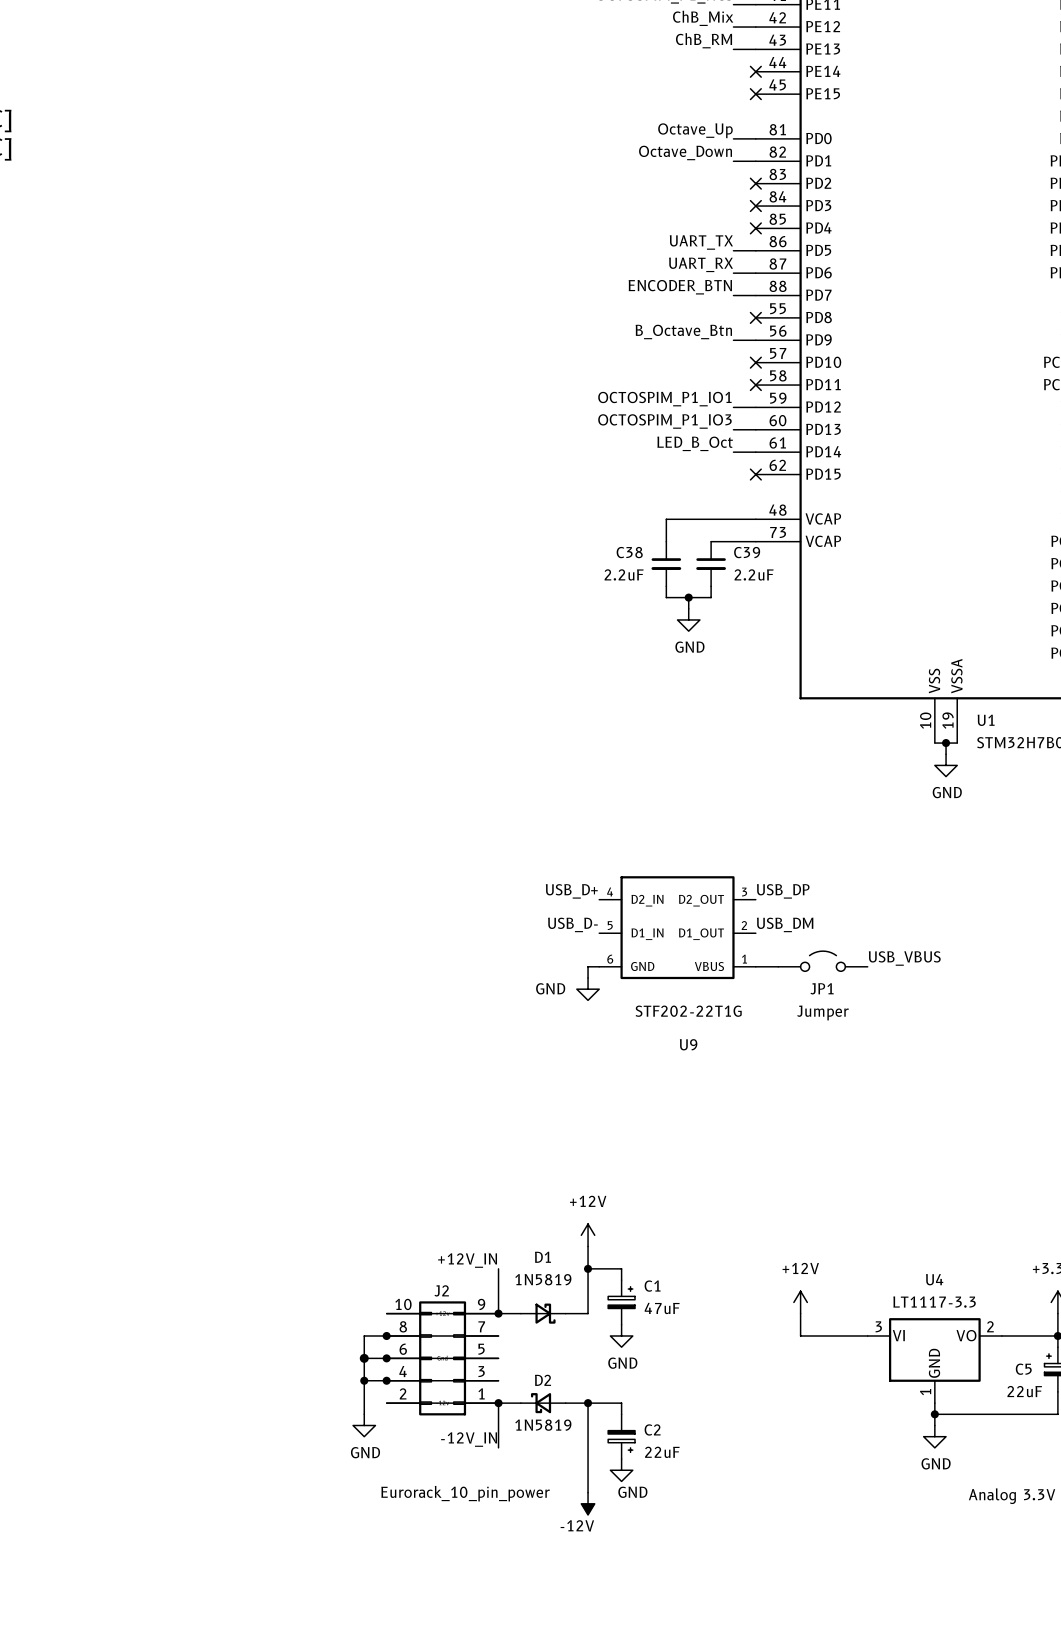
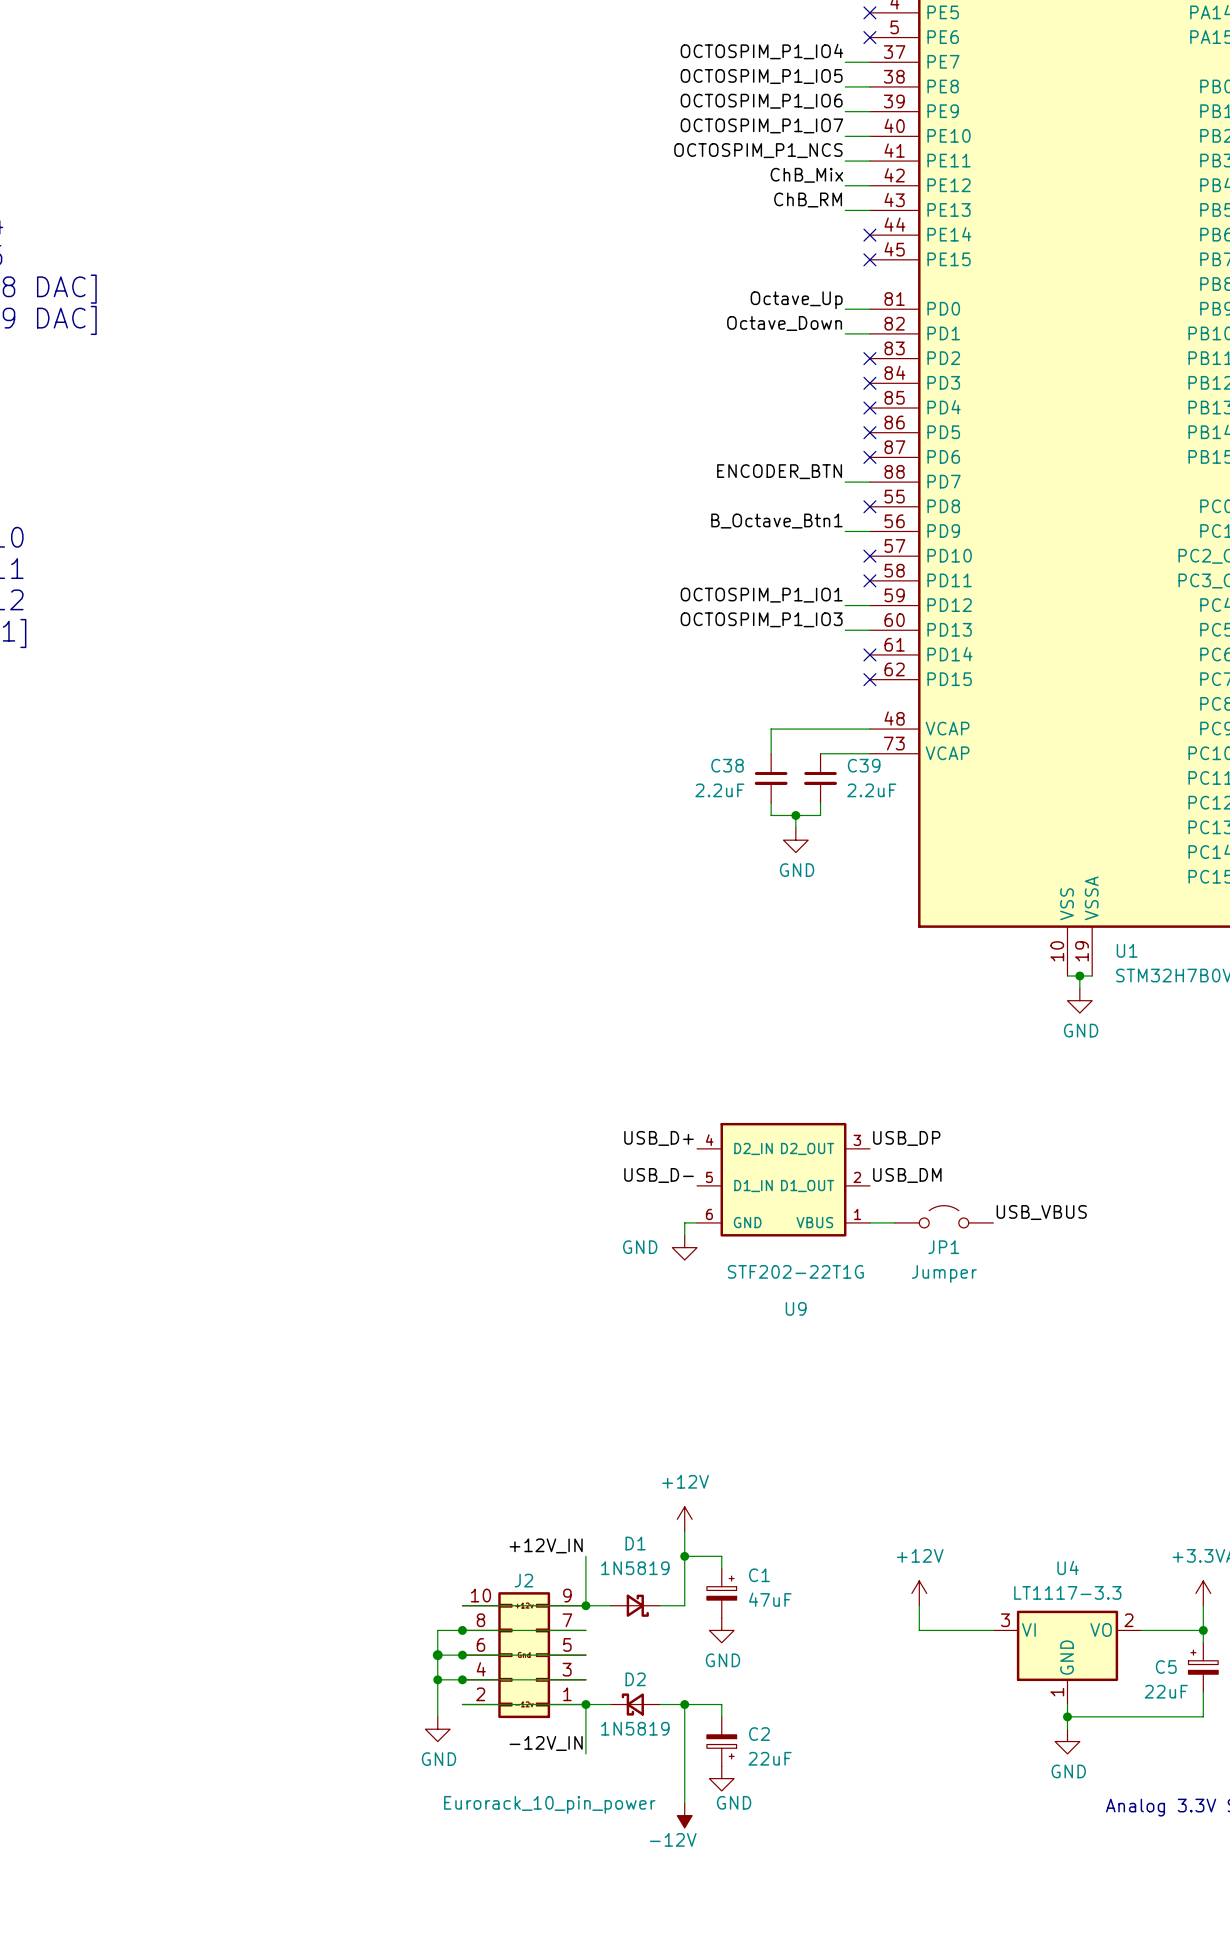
label: UART_TX (701, 242) -> none
wire: (733, 250) (755, 250) -> none
no-connect mark: none -> (869, 432)
label: UART_RX (701, 264) -> none
wire: (733, 273) (755, 273) -> none
no-connect mark: none -> (869, 457)
label: B_Octave_Btn (683, 331) -> B_Octave_Btn1 (776, 521)
label: LED_B_Oct (695, 443) -> none
wire: (733, 452) (755, 452) -> none
no-connect mark: none -> (869, 654)

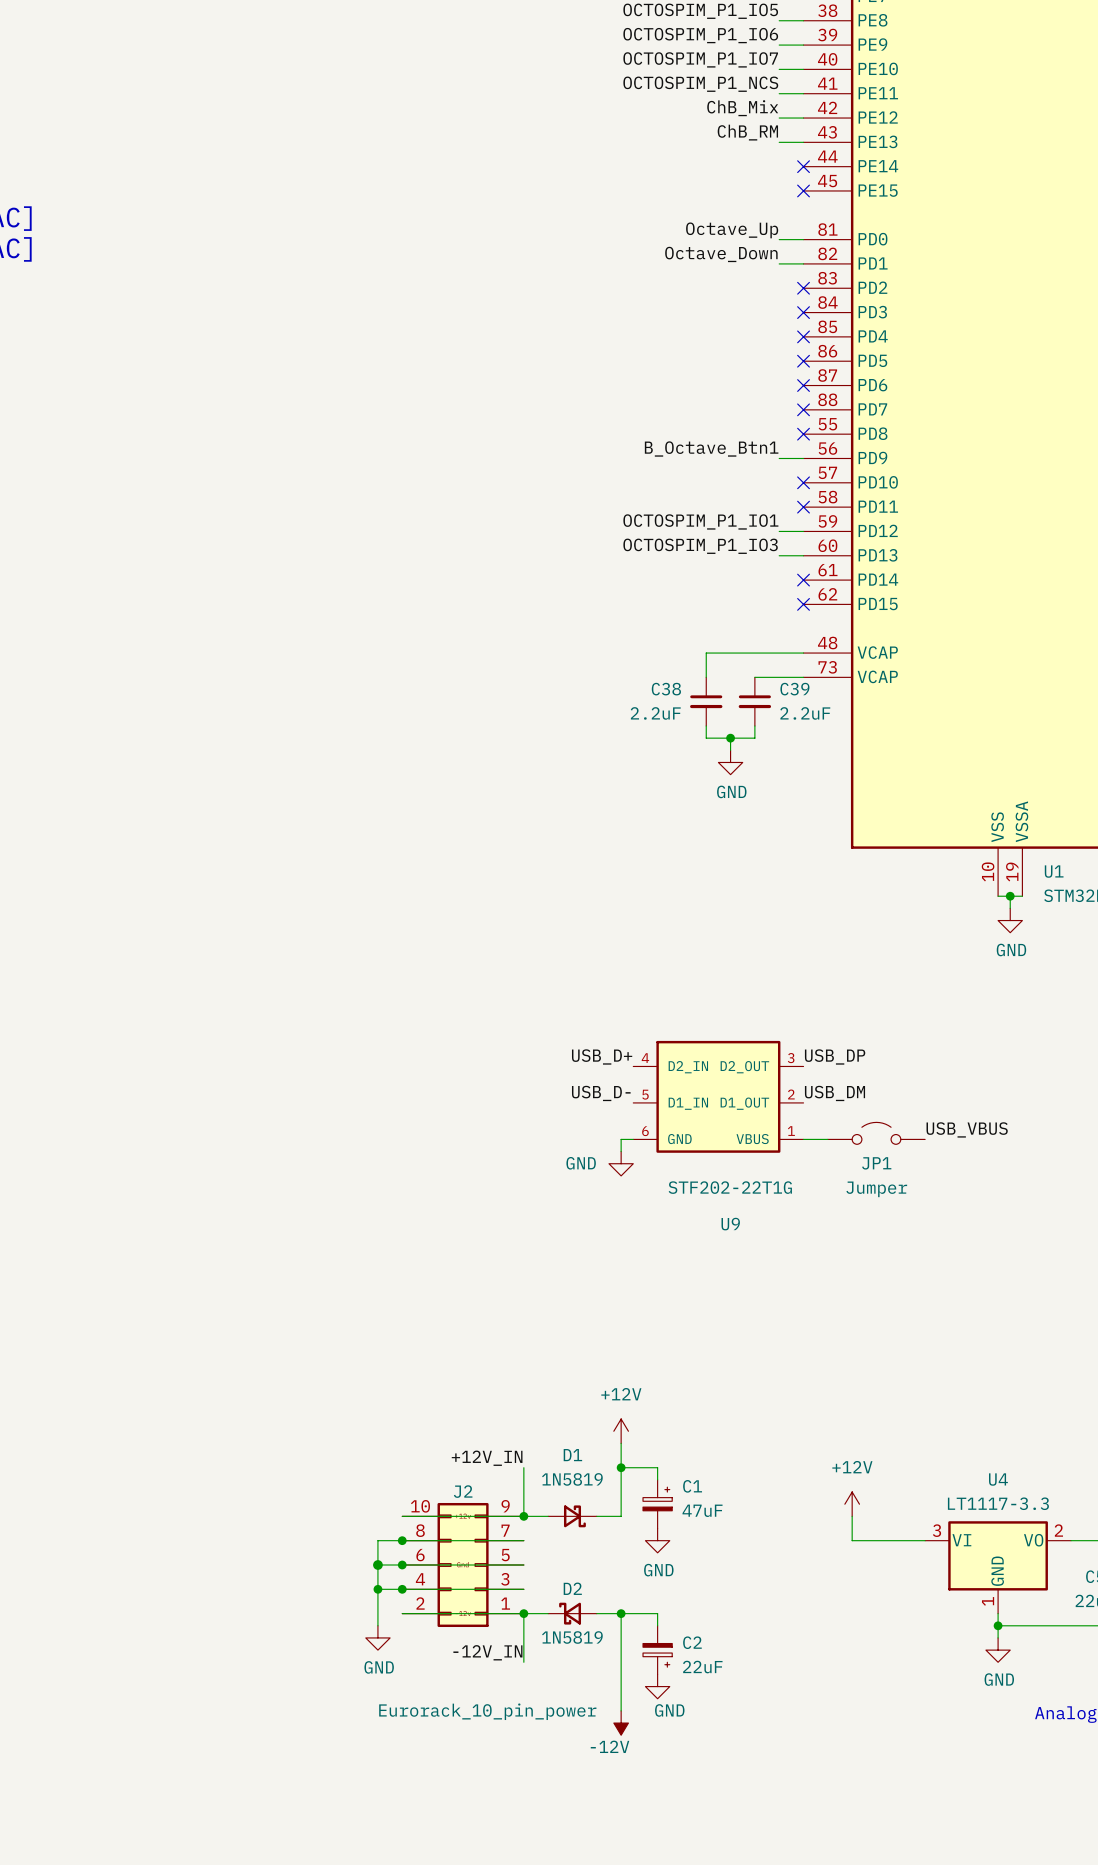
label: ENCODER_BTN (779, 471) -> none
wire: (845, 482) (869, 482) -> none
no-connect mark: none -> (803, 409)

